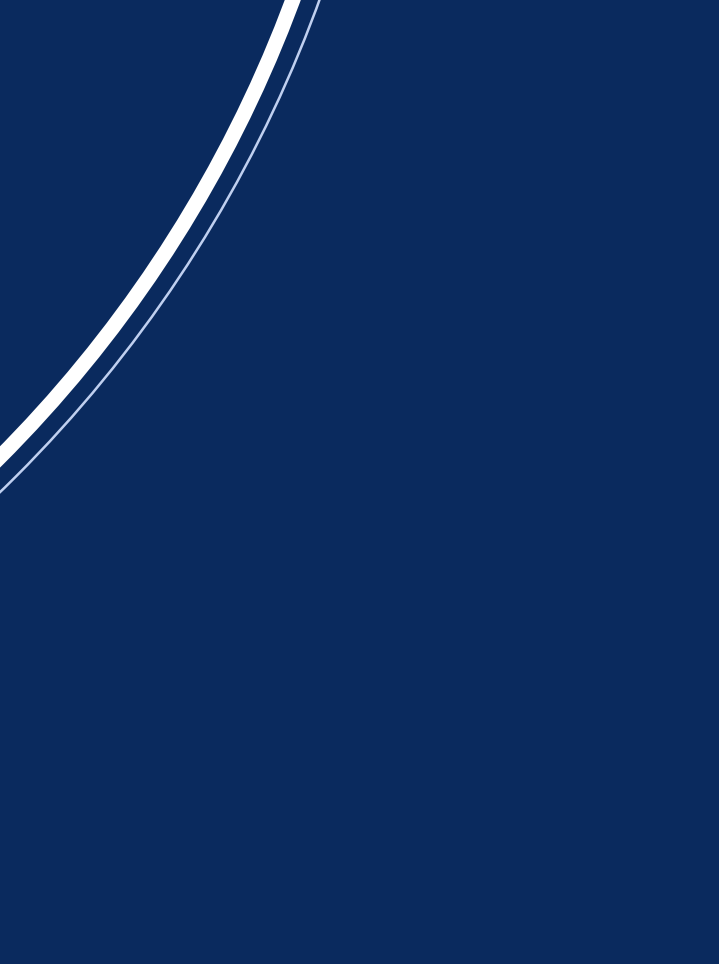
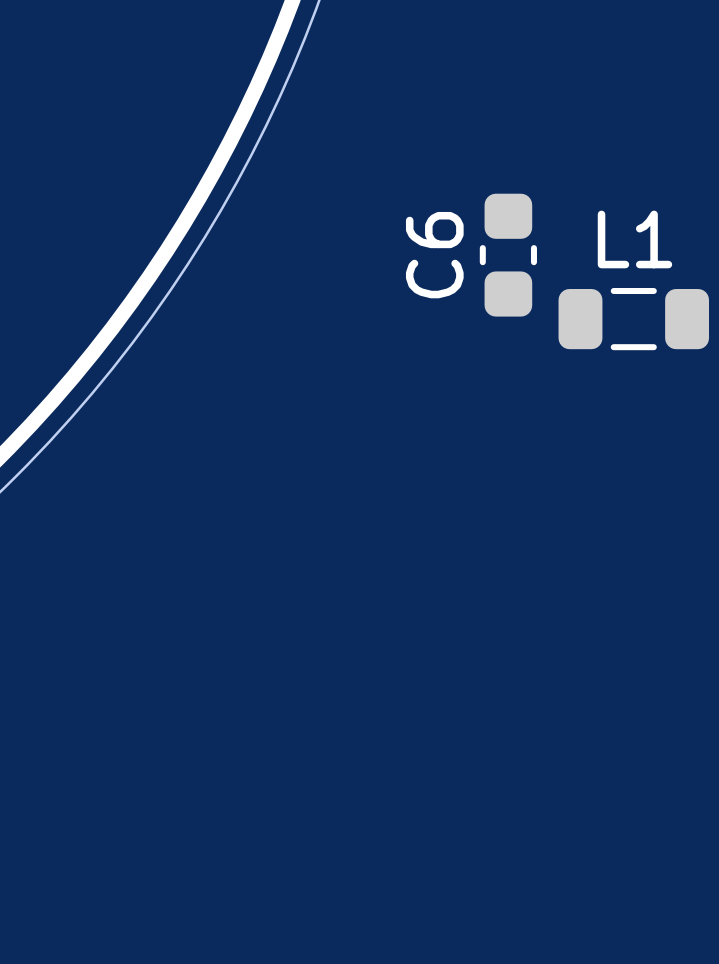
C6: none -> (508, 255)
L1: none -> (633, 319)

